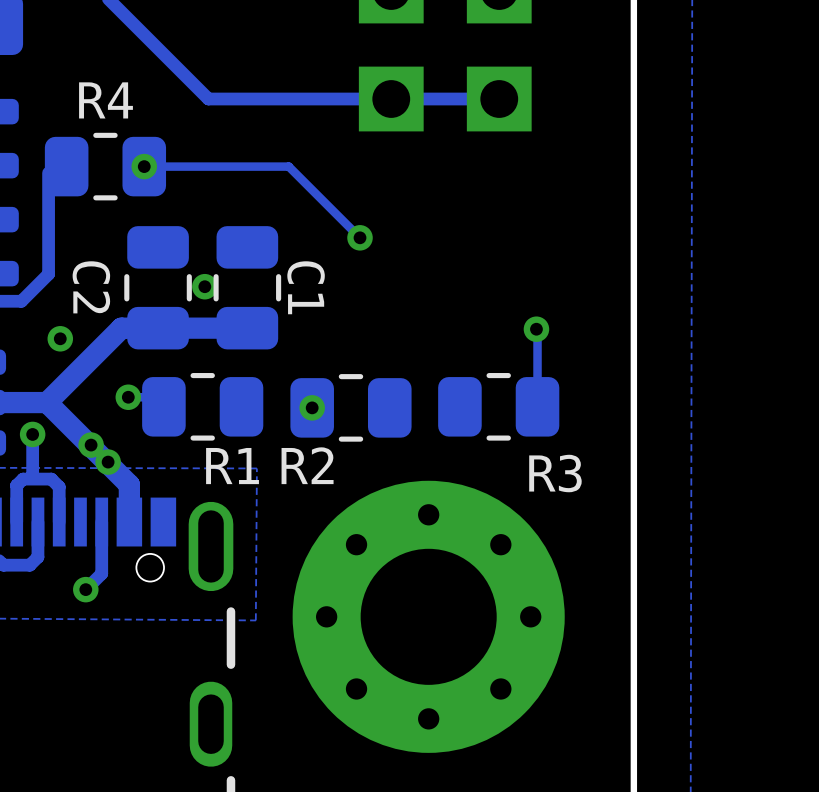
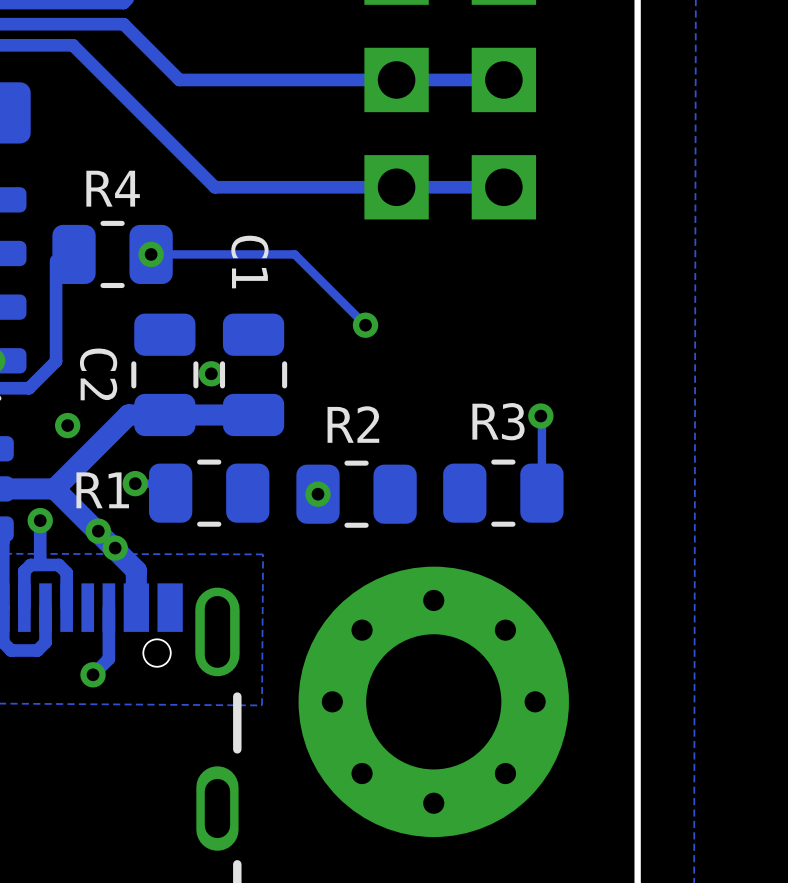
C1 name position: C1 (306, 287) -> C1 (249, 262)
R2 name position: R2 (307, 465) -> R2 (353, 424)
R1 name position: R1 (232, 466) -> R1 (102, 490)
R3 name position: R3 (555, 473) -> R3 (498, 421)

